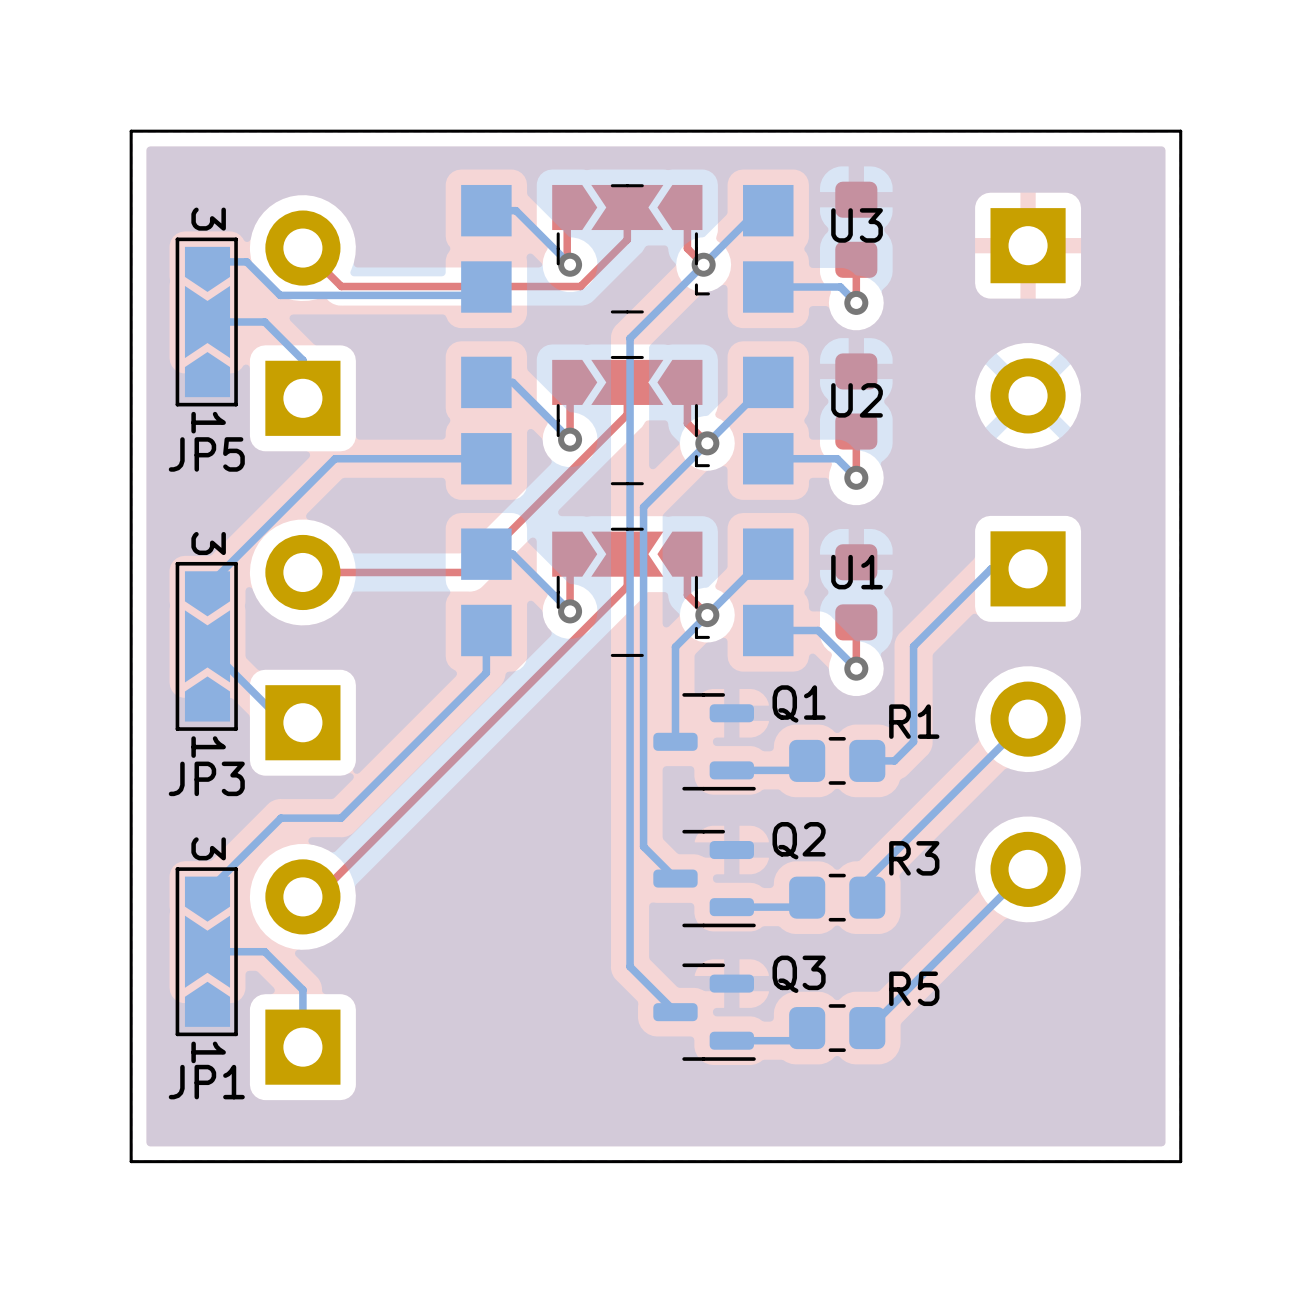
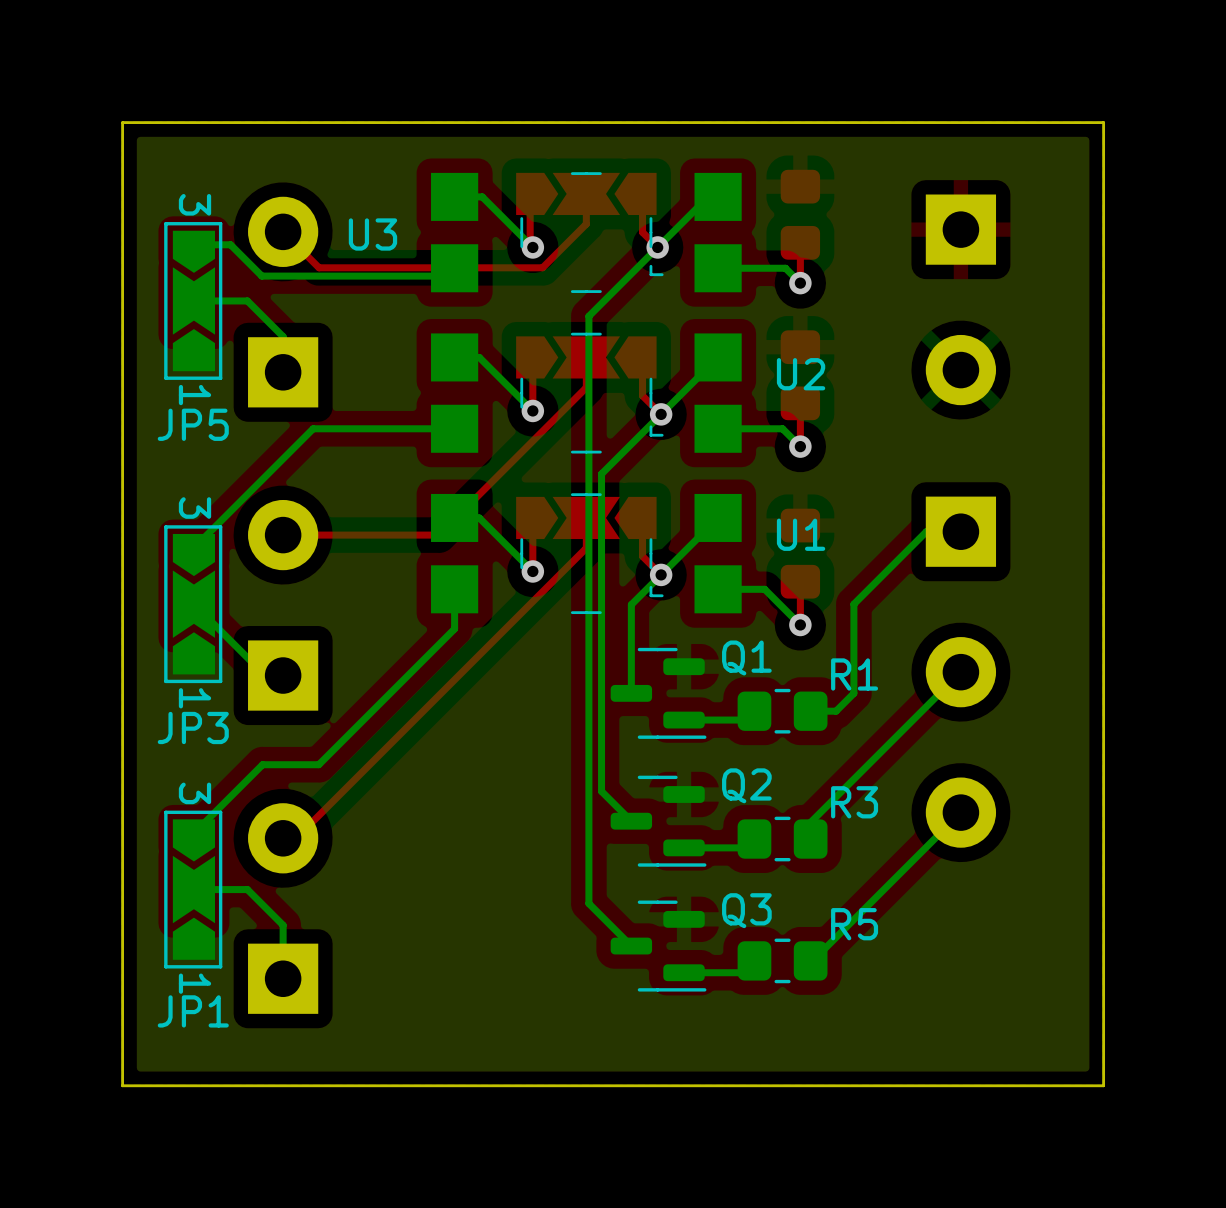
U3 name position: U3 (857, 225) -> U3 (372, 234)

